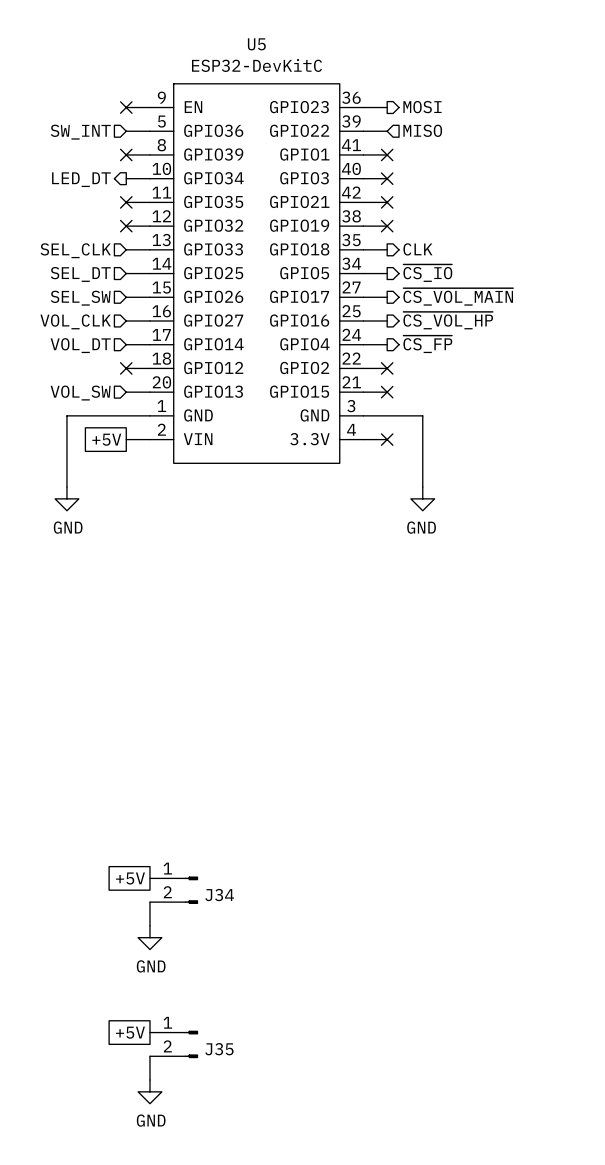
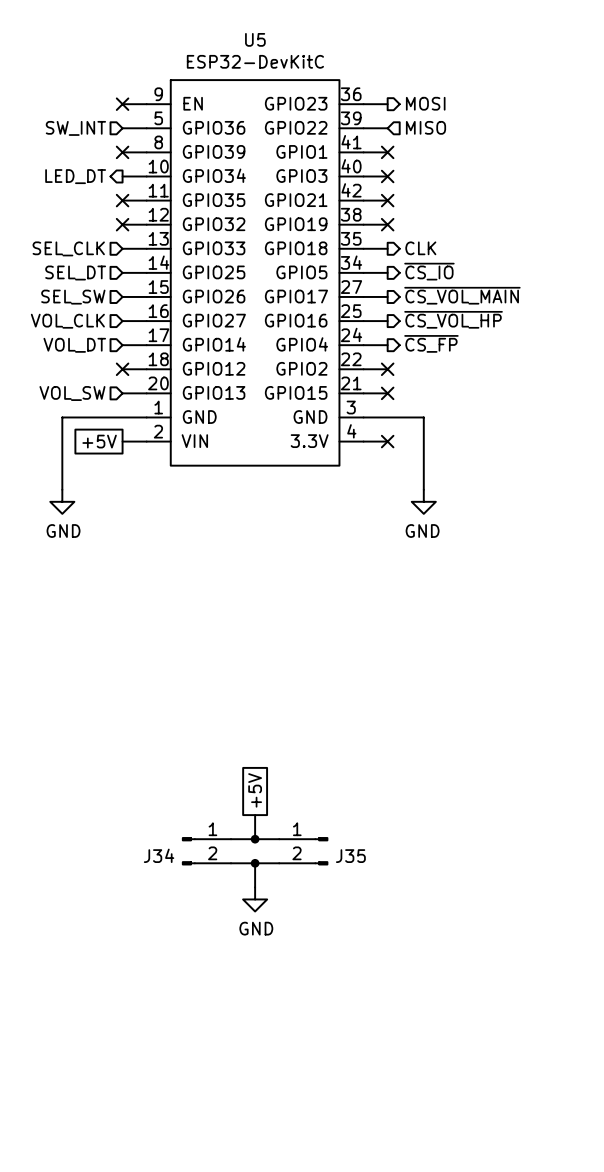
global label: none -> +5V (255, 790)
wire: none -> (255, 815) (255, 839)
wire: none -> (231, 839) (279, 839)
junction: none -> (255, 839)
wire: none -> (231, 863) (279, 863)
junction: none -> (255, 863)
global label: +5V (130, 878) -> none
J34 position: (174, 890) -> (206, 851)
J34 flip: as is (191, 890) -> left-right (188, 851)
power symbol: none -> GND (255, 899)
wire: (149, 902) (149, 925) -> (255, 863) (255, 887)
power symbol: GND (149, 937) -> none
global label: +5V (130, 1032) -> none
J35 position: (174, 1044) -> (303, 851)
wire: (149, 1056) (149, 1080) -> none
power symbol: GND (149, 1091) -> none

